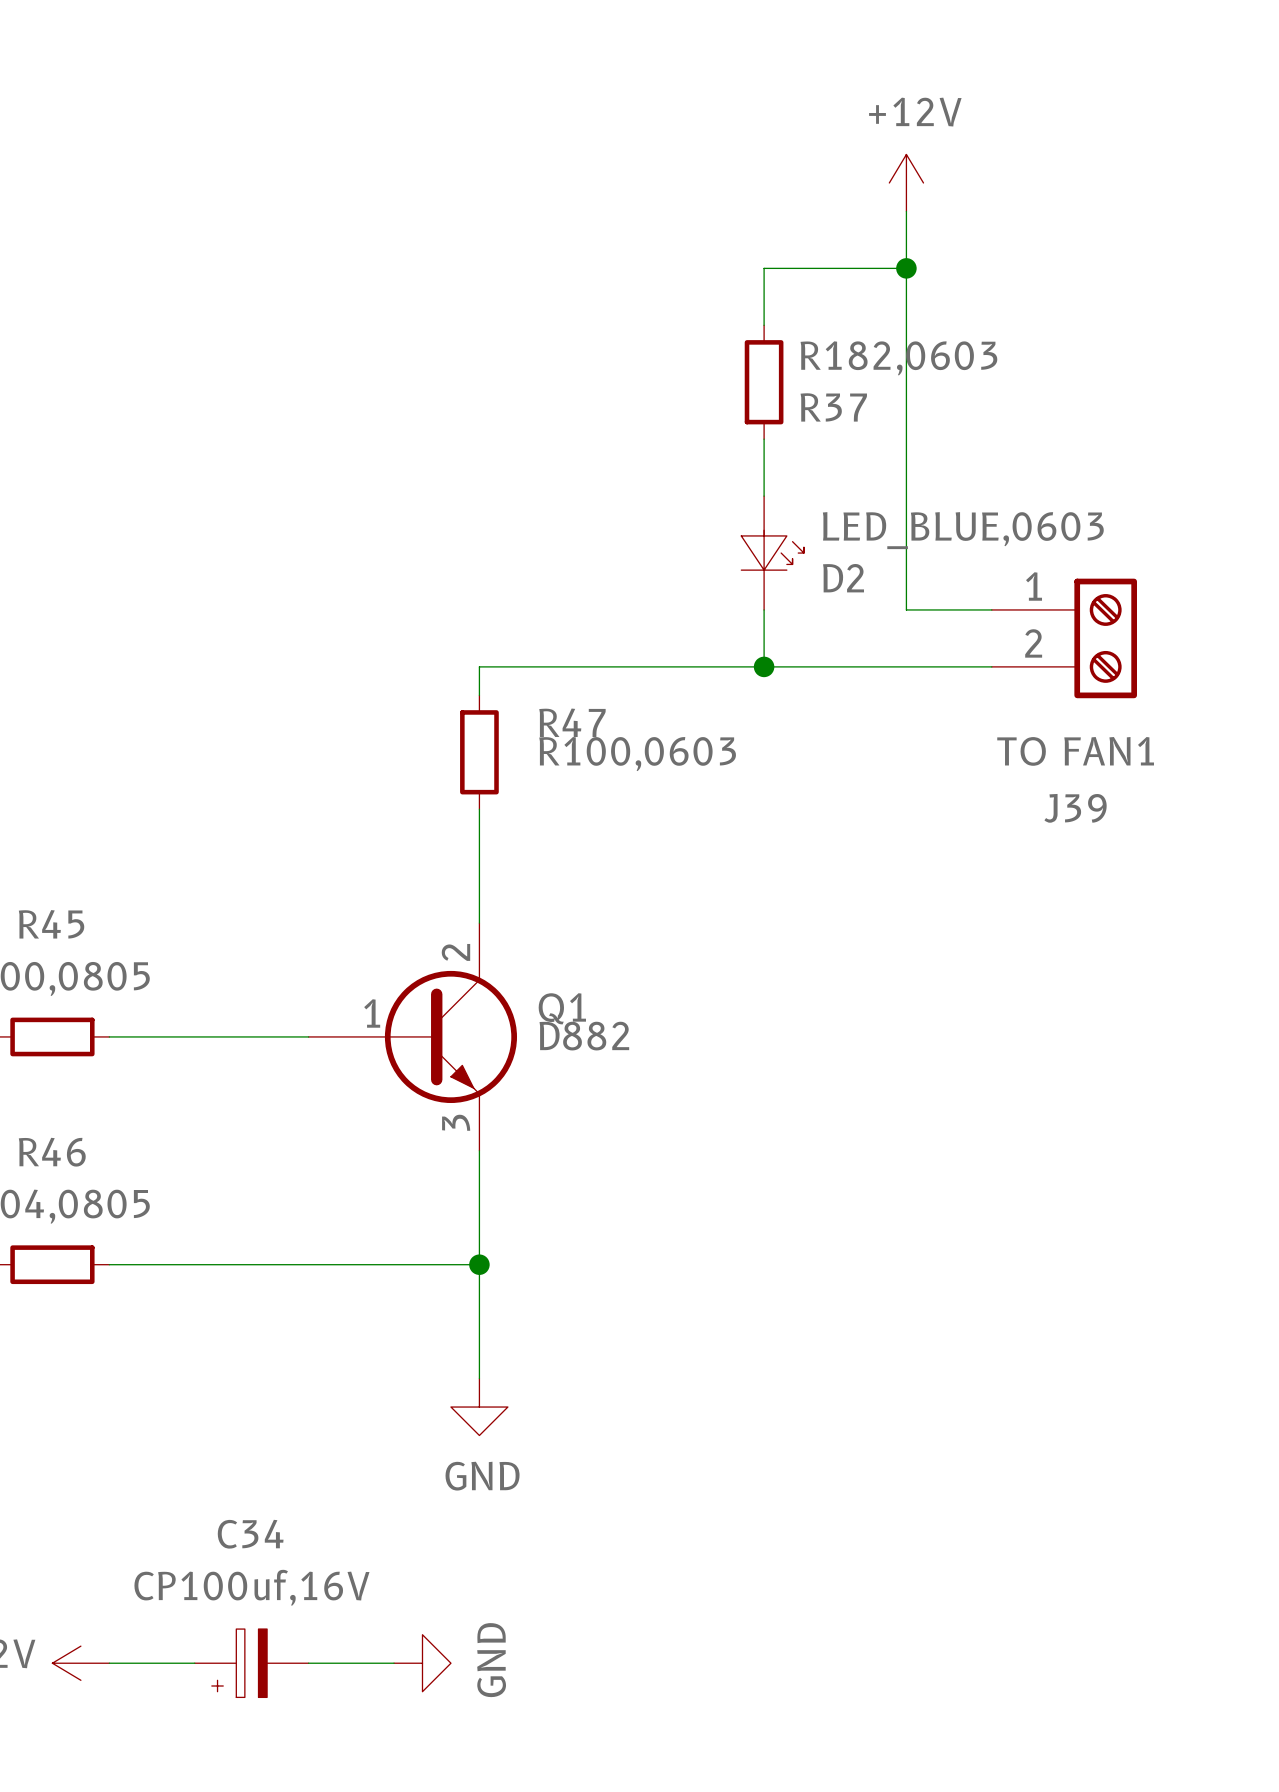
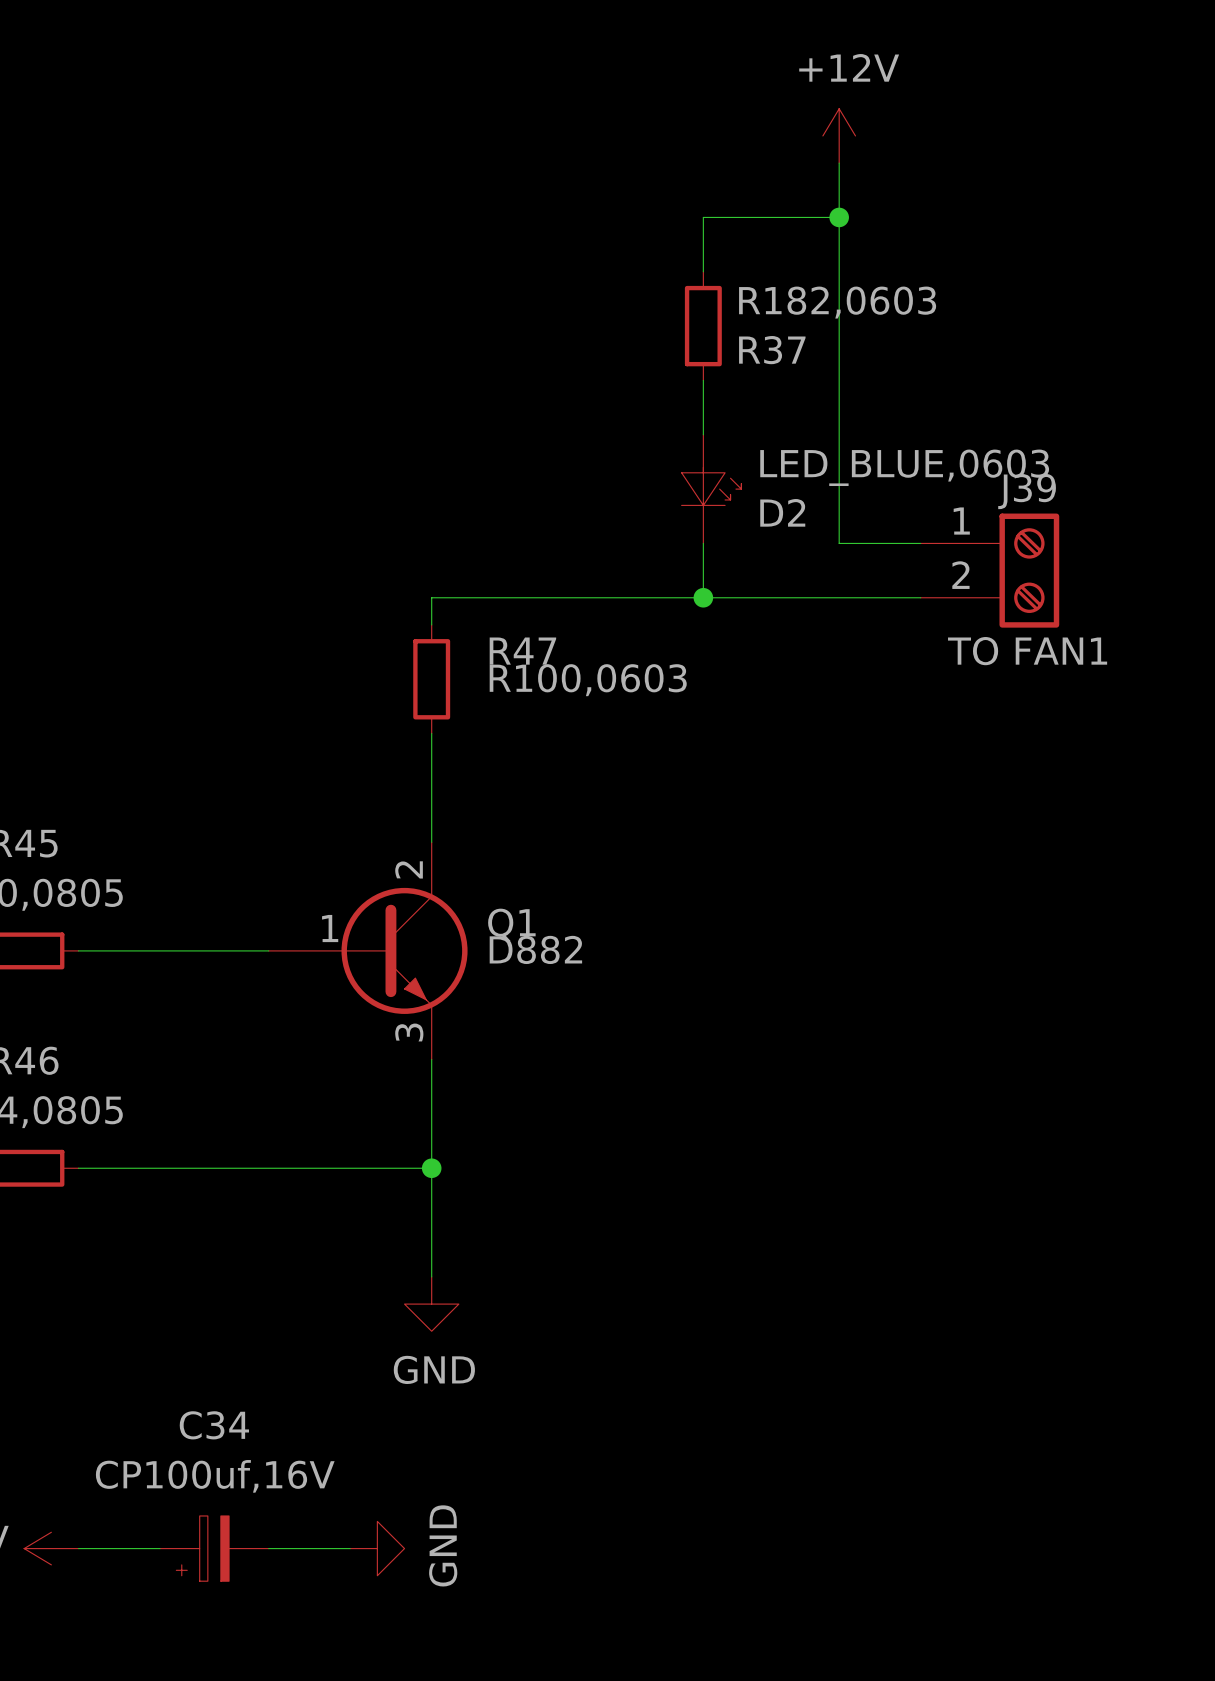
J39 value position: TO FAN1 (1075, 751) -> TO FAN1 (1027, 651)
J39 name position: J39 (1075, 808) -> J39 (1027, 491)

